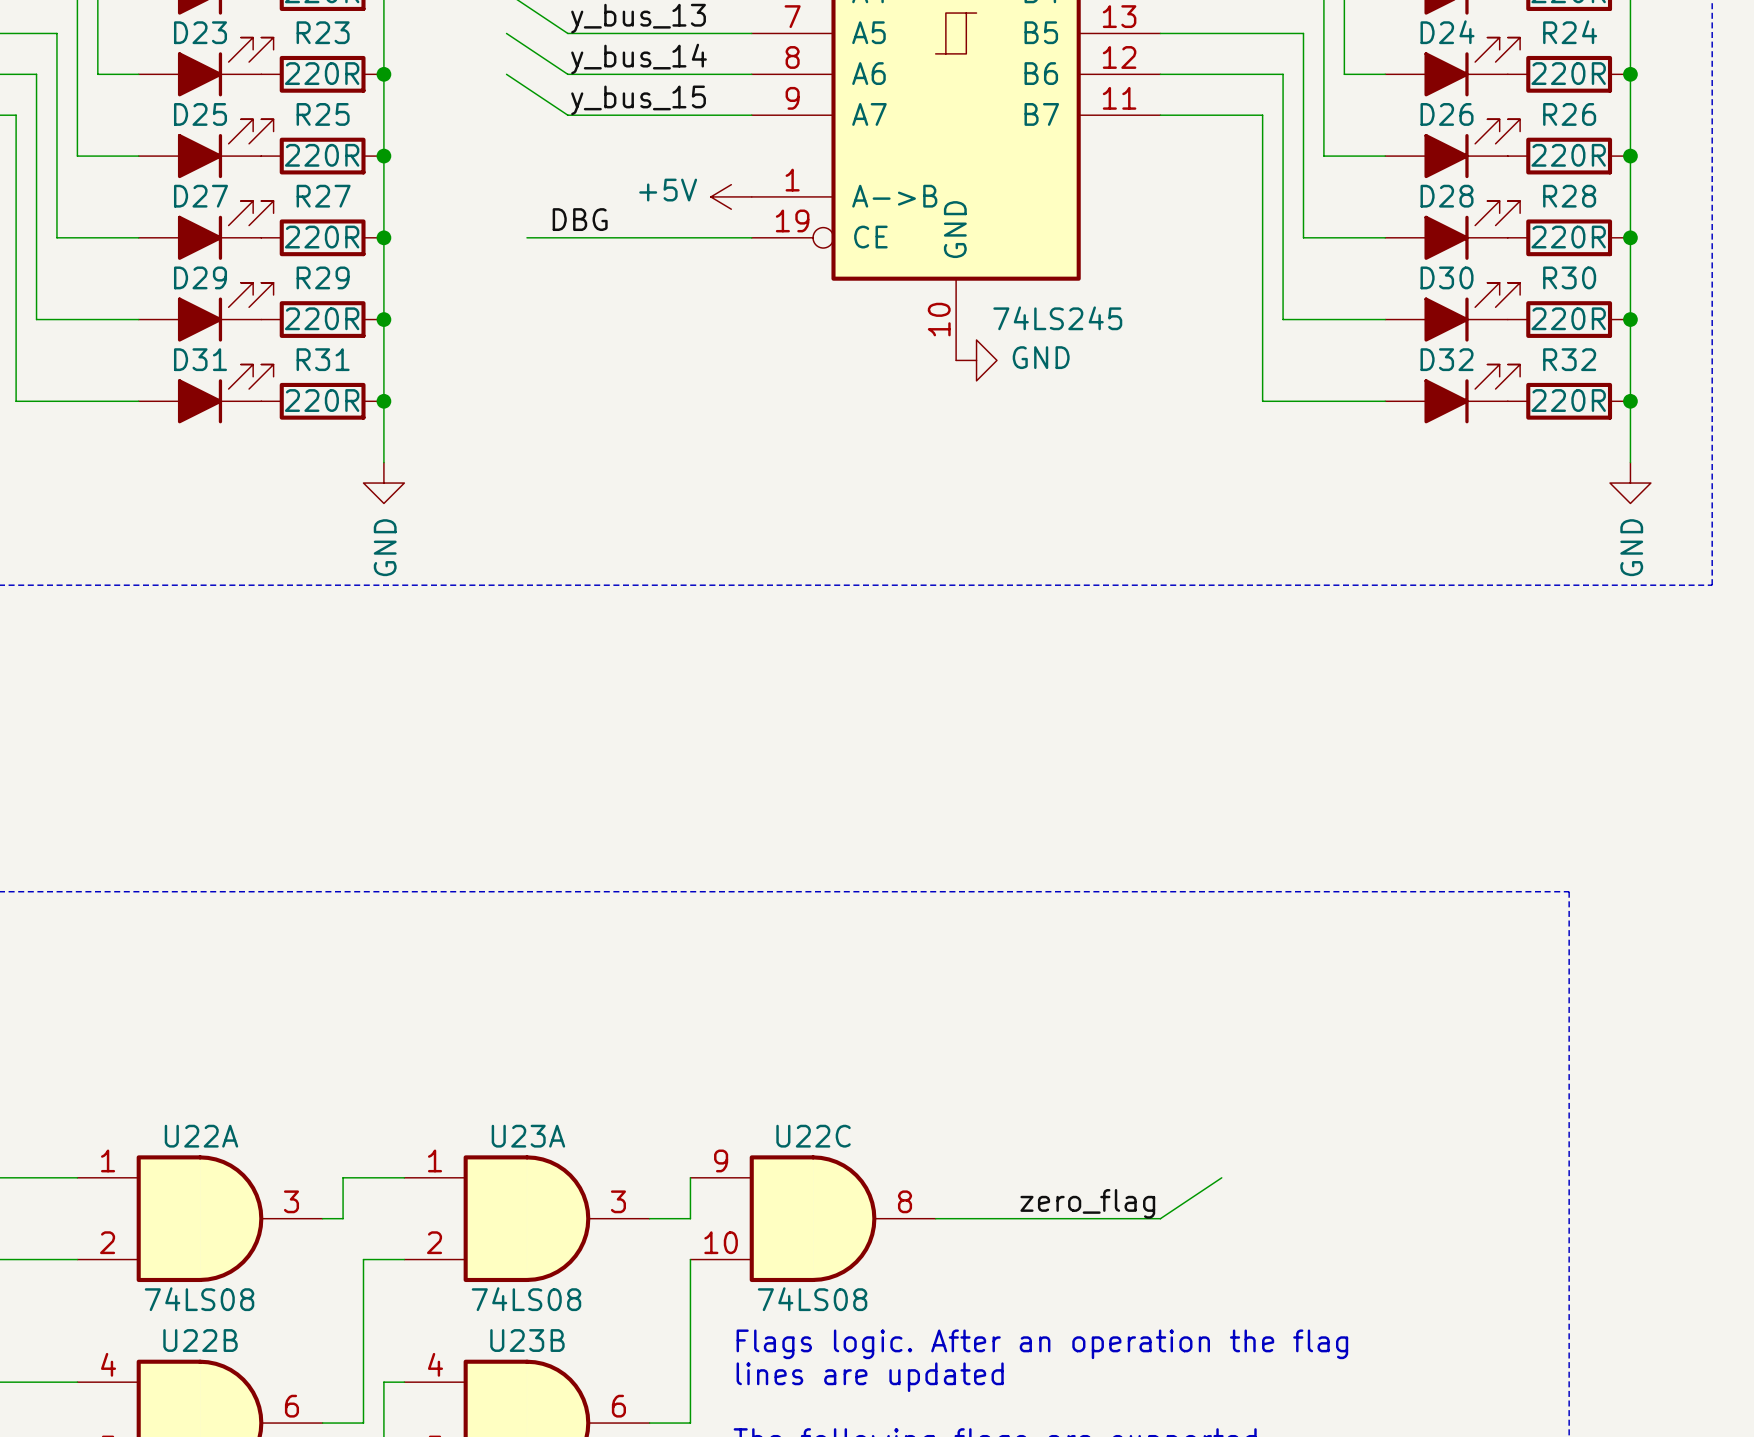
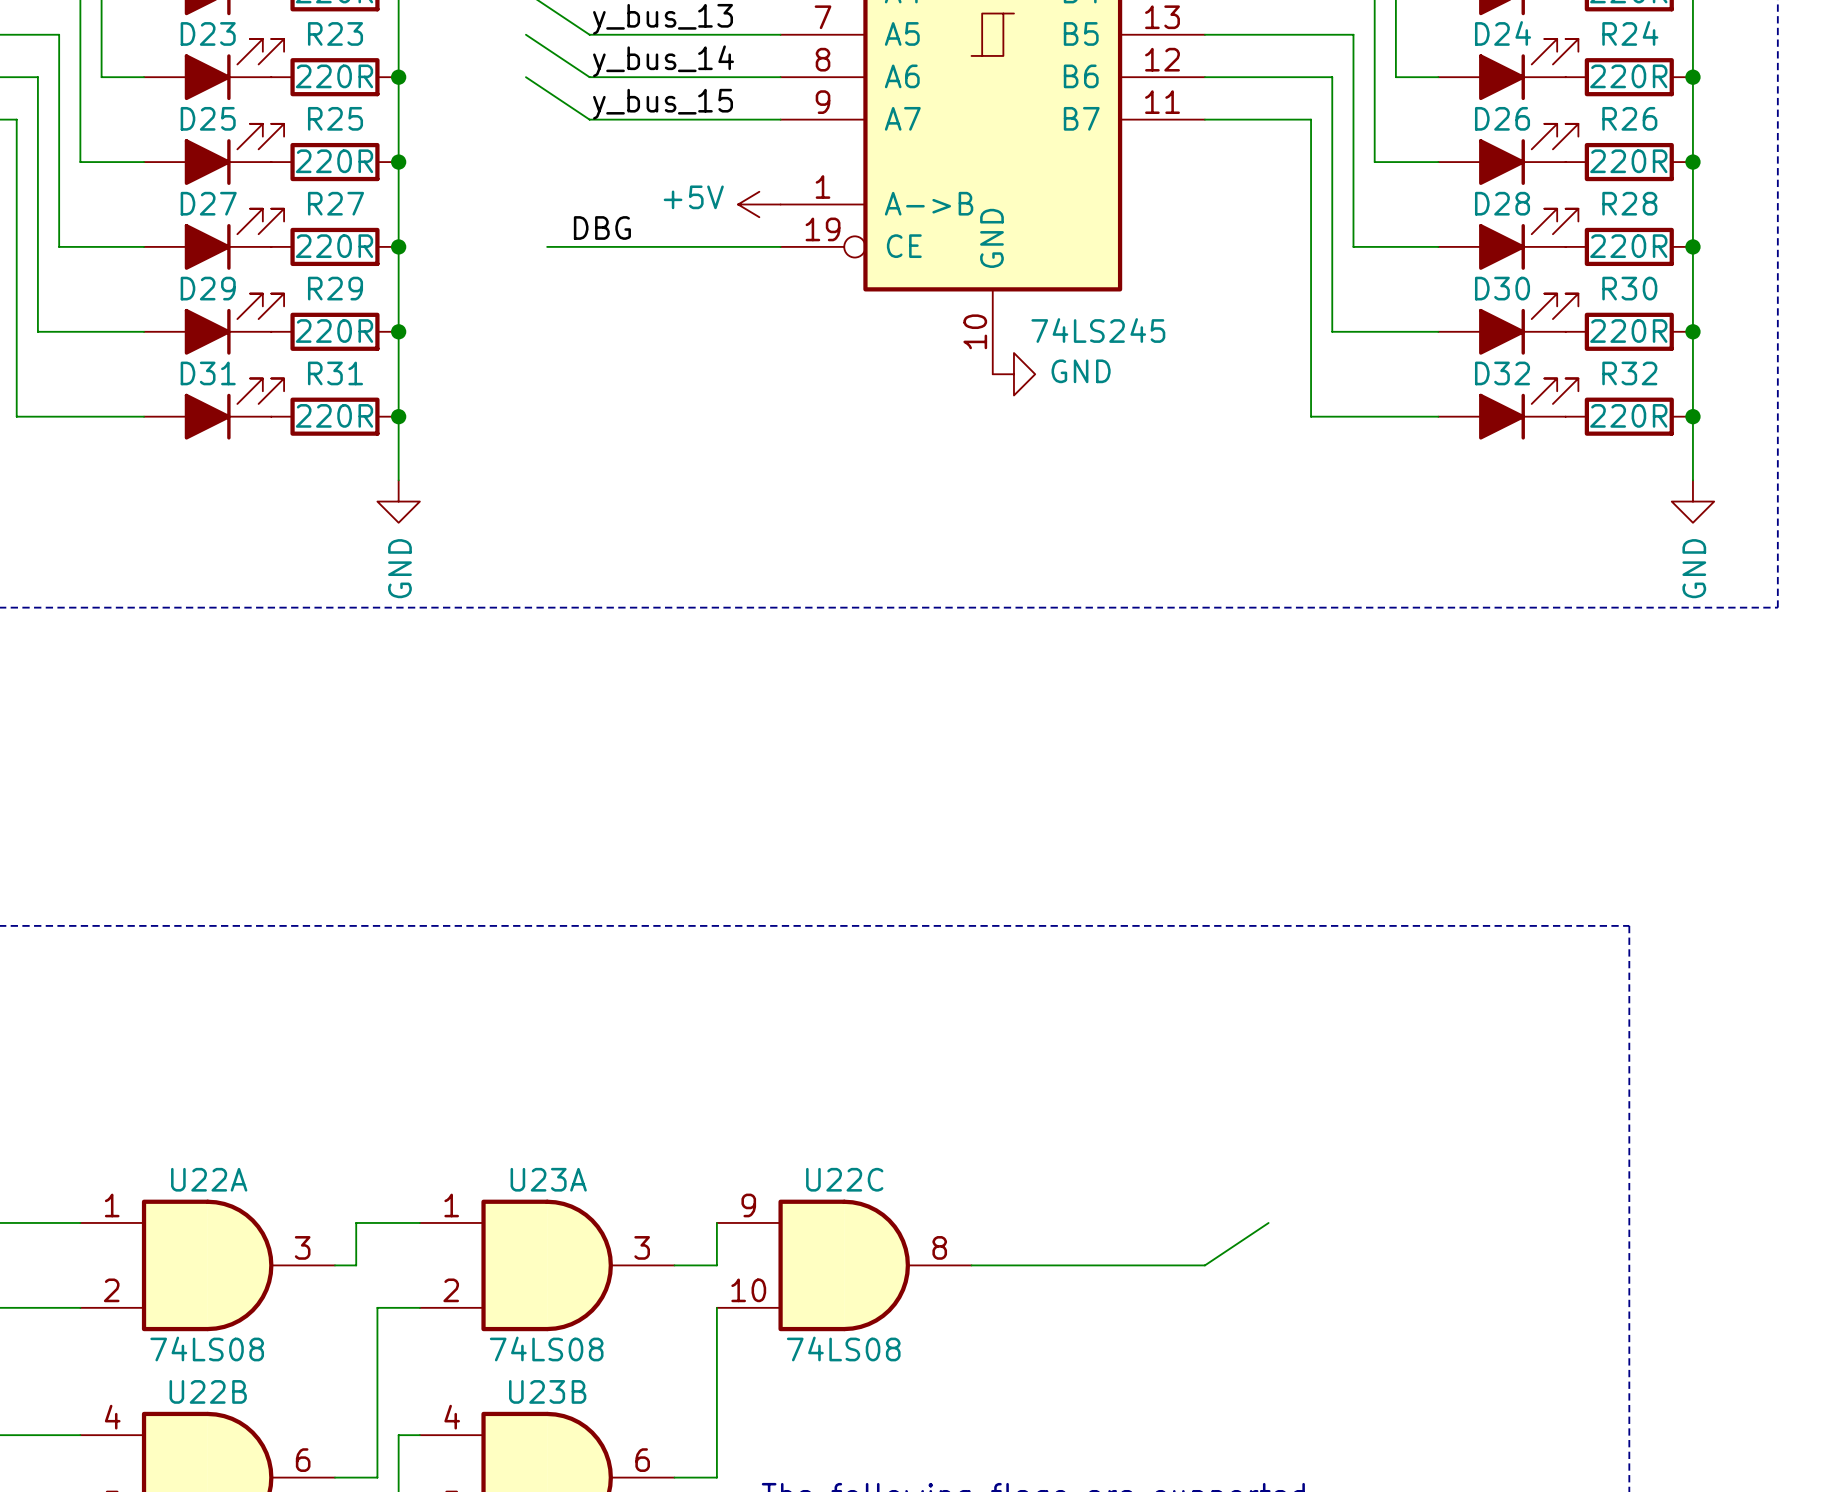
label: zero_flag (1087, 1203) -> none
text: Flags logic. After an operation the flag (1042, 1344) -> none
text: lines are updated (870, 1377) -> none

